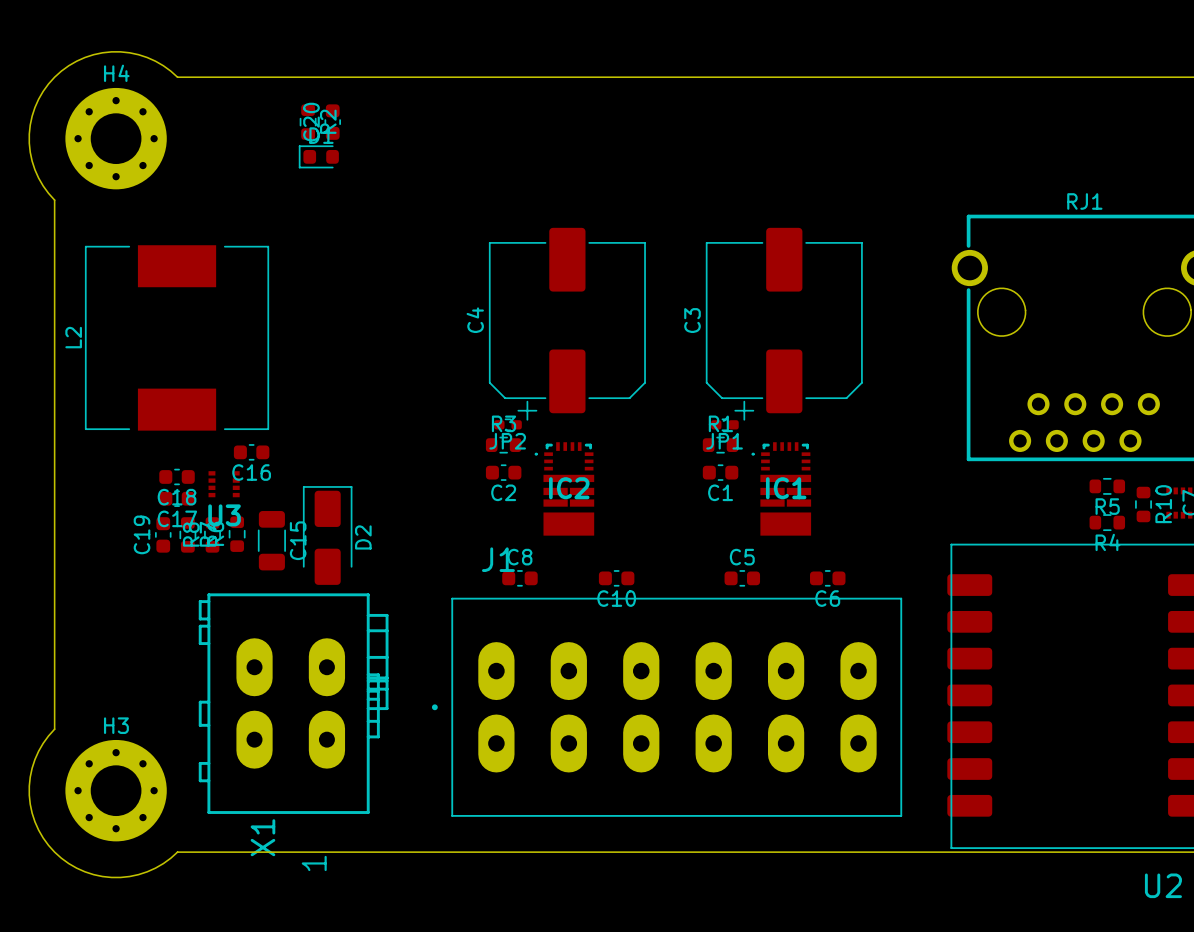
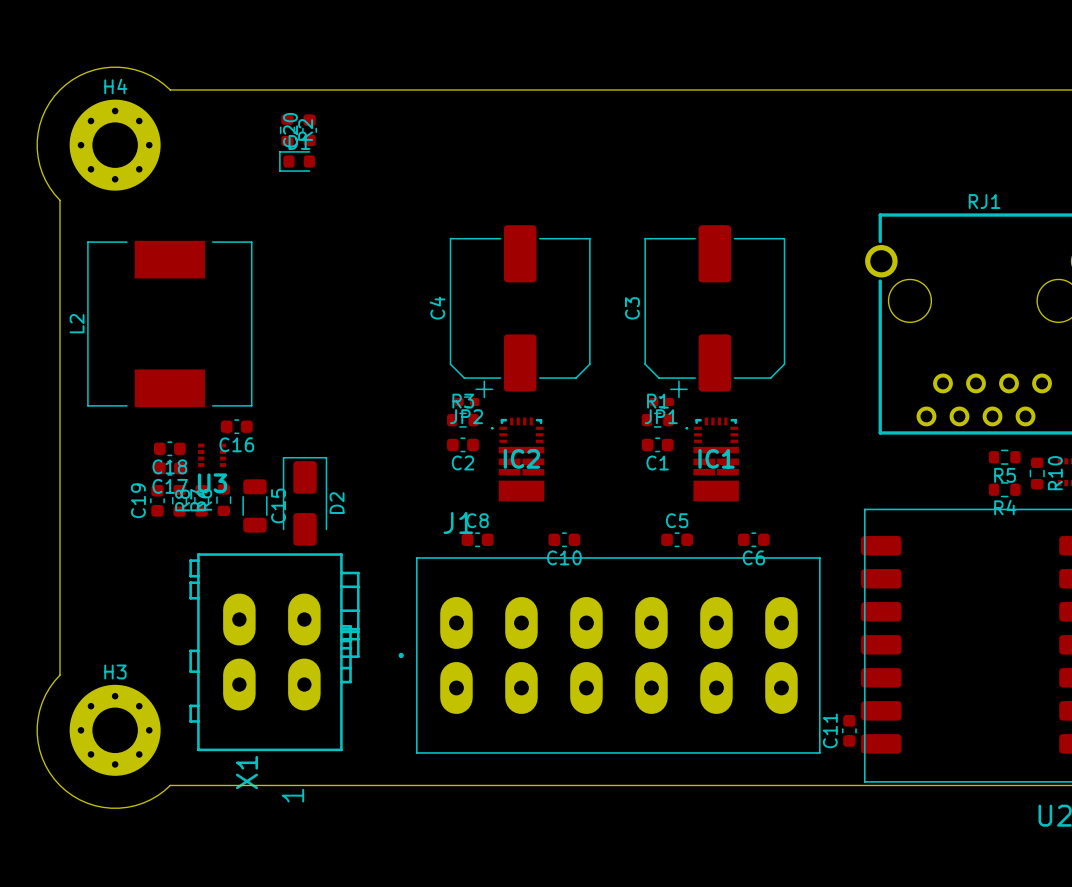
C11: none -> (849, 730)

